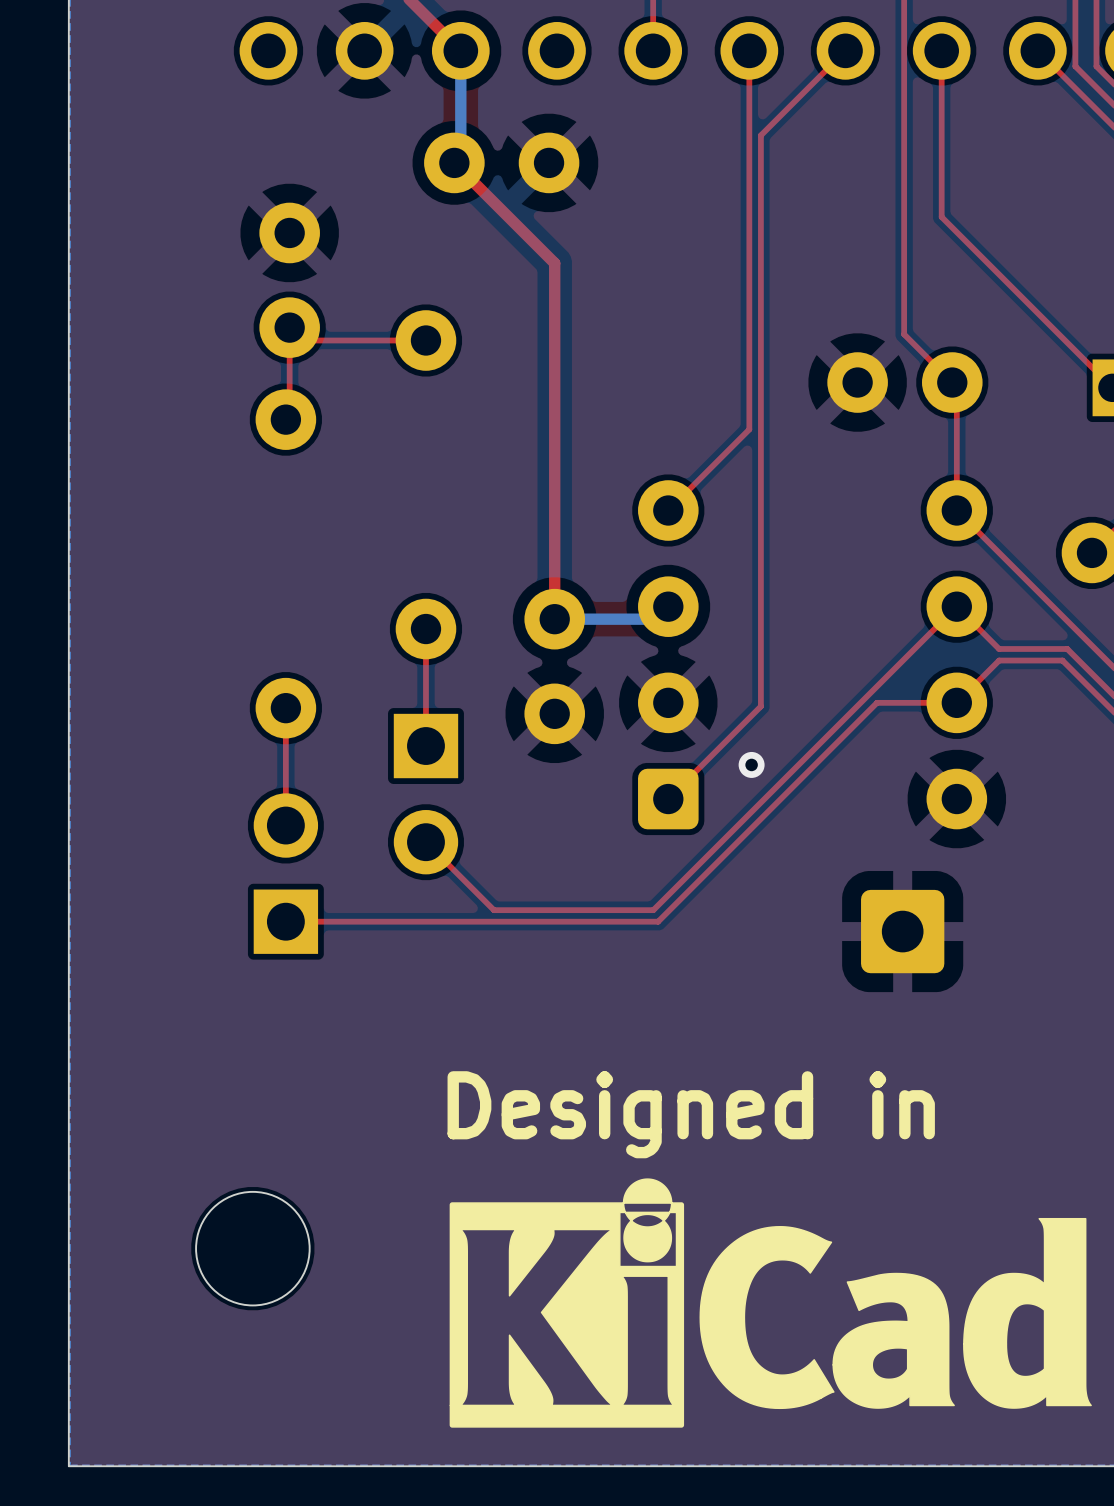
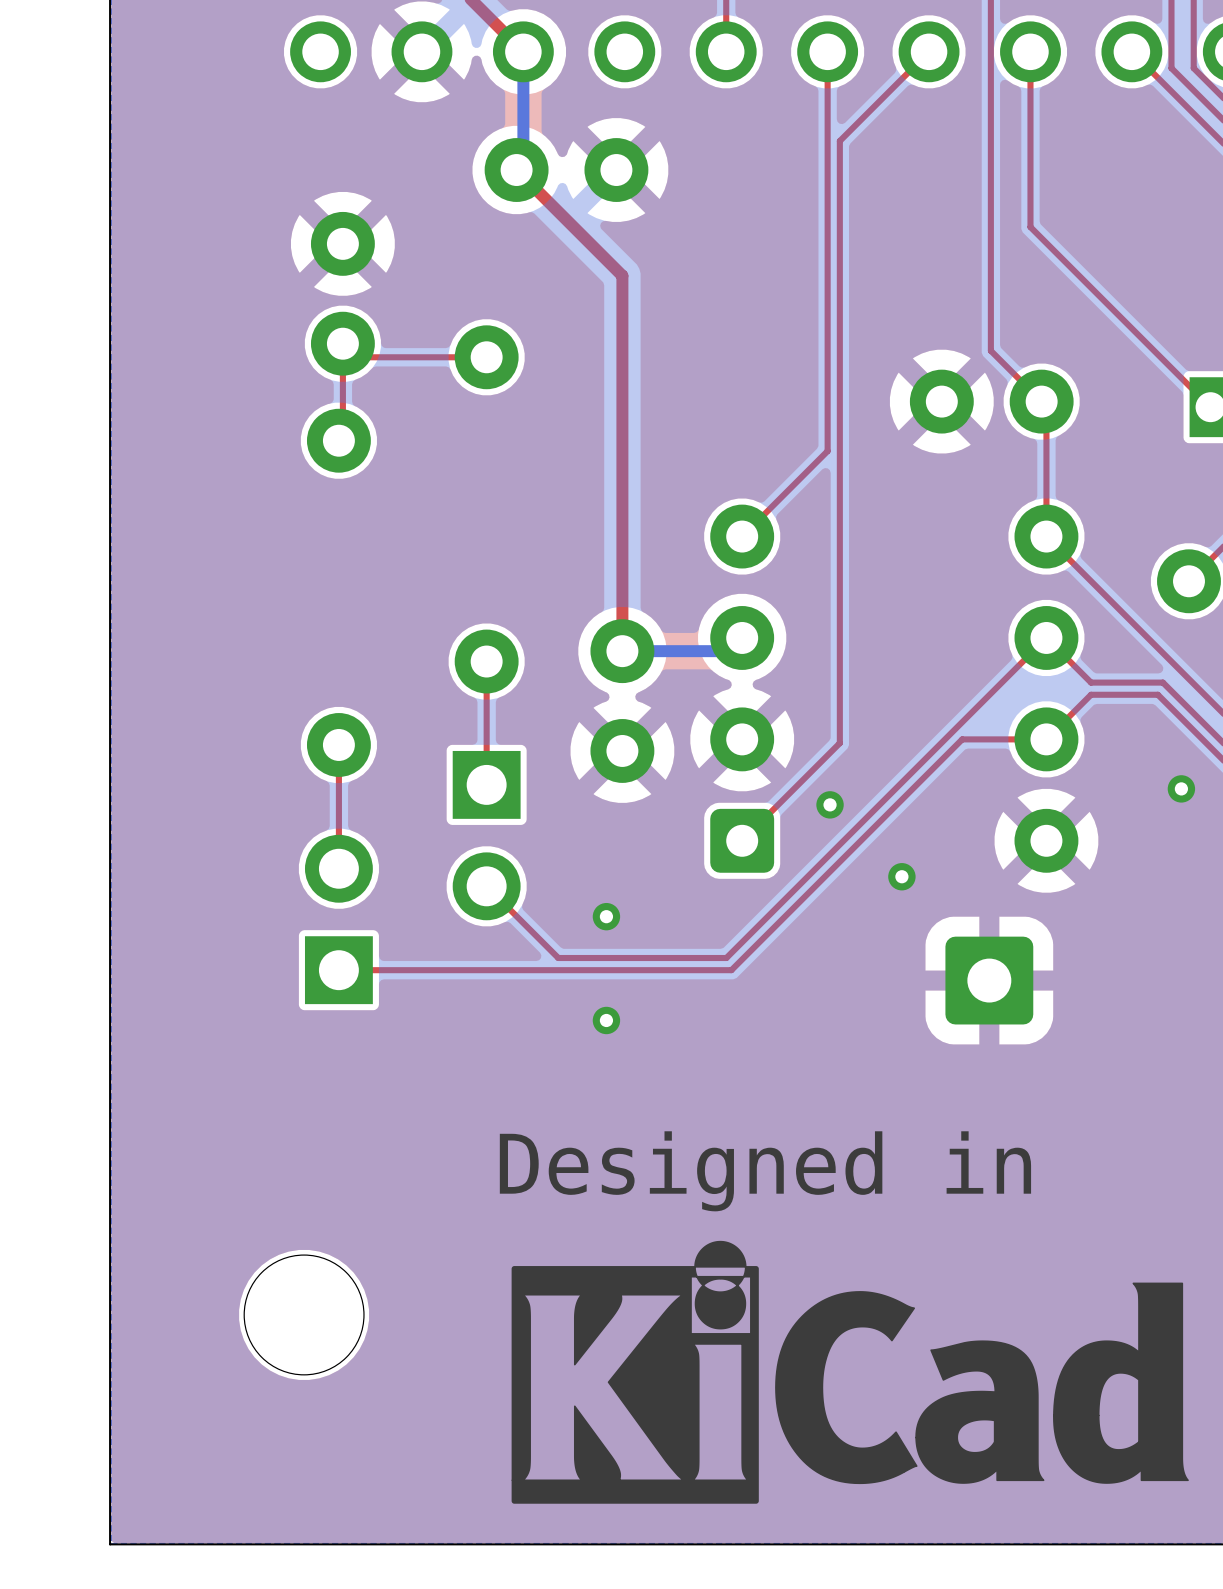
via: none -> (1181, 788)
via: none -> (901, 876)
via: none -> (606, 916)
via: none -> (606, 1020)

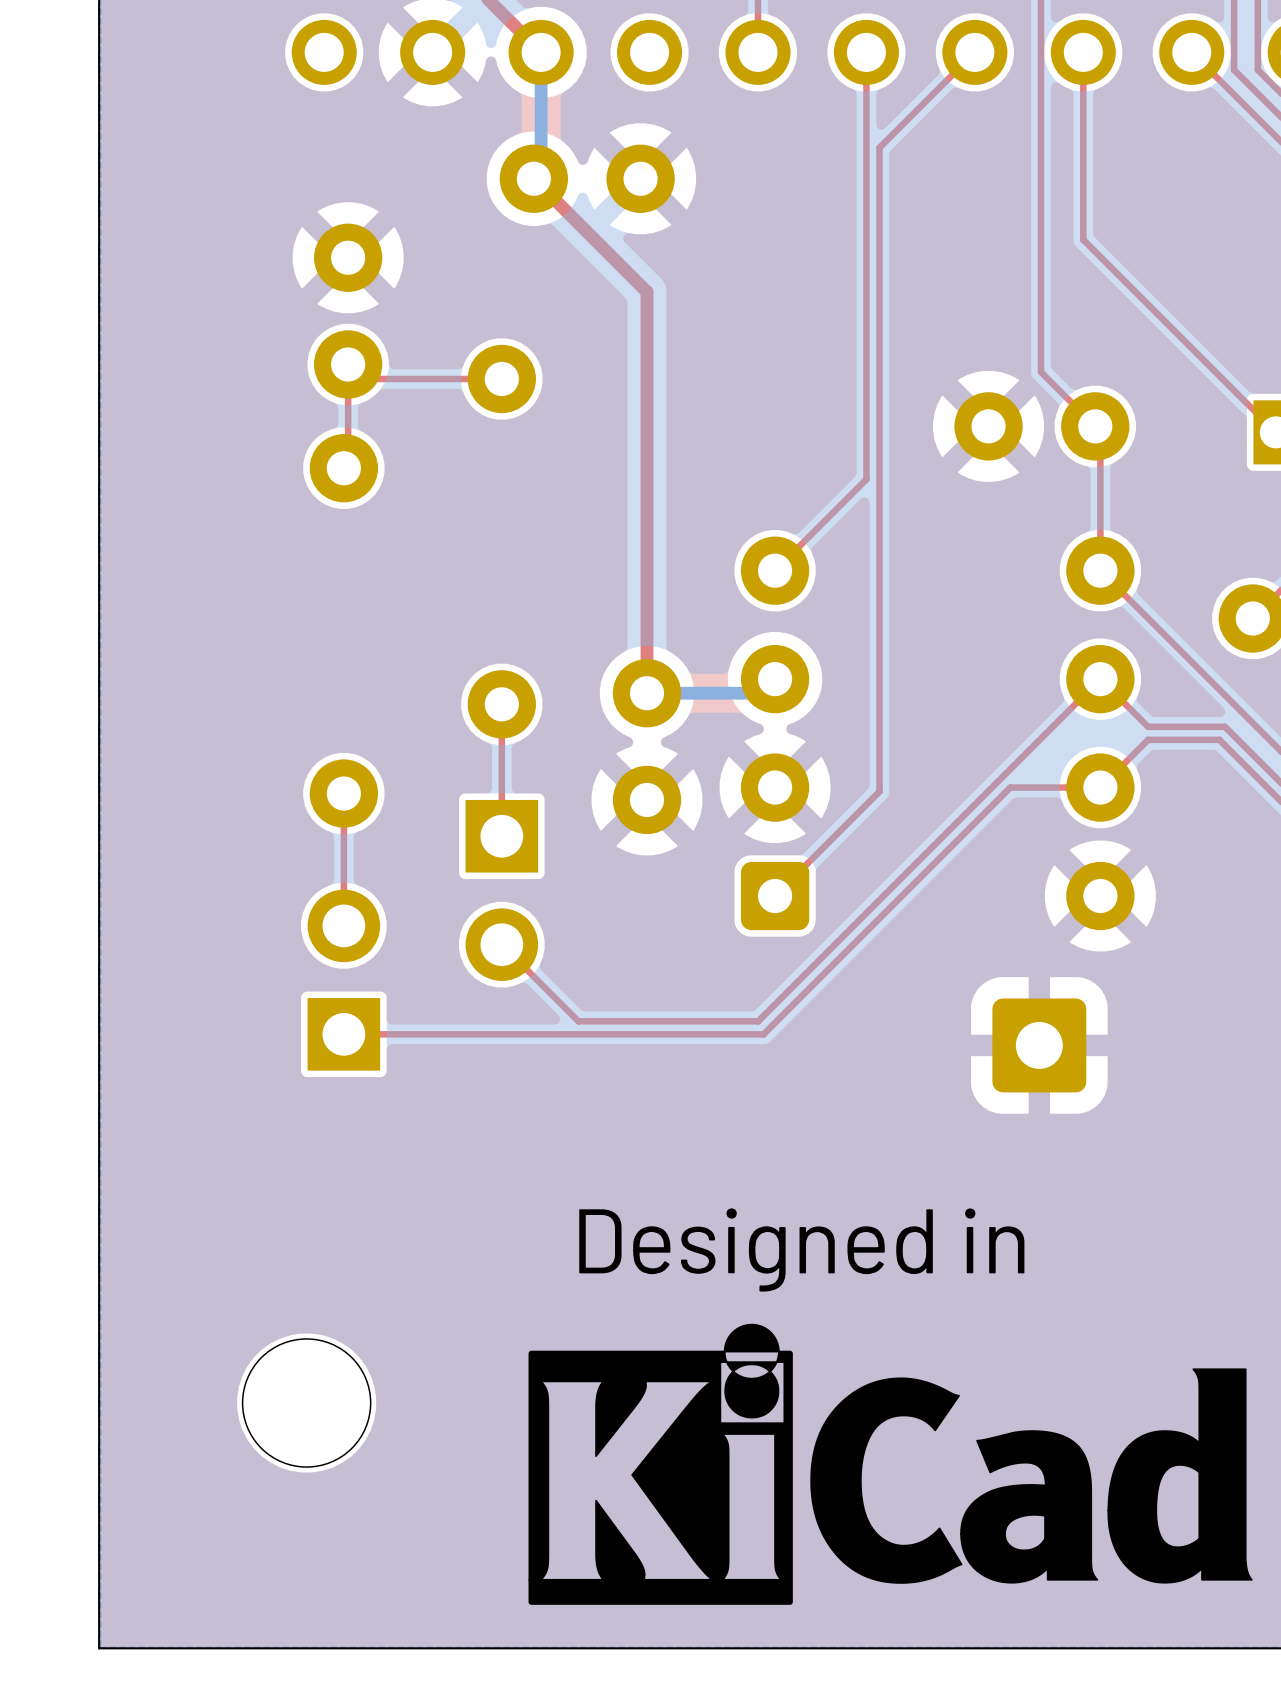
via: (1181, 788) -> none
via: (830, 804) -> none
via: (901, 876) -> none
via: (606, 916) -> none
via: (606, 1020) -> none

